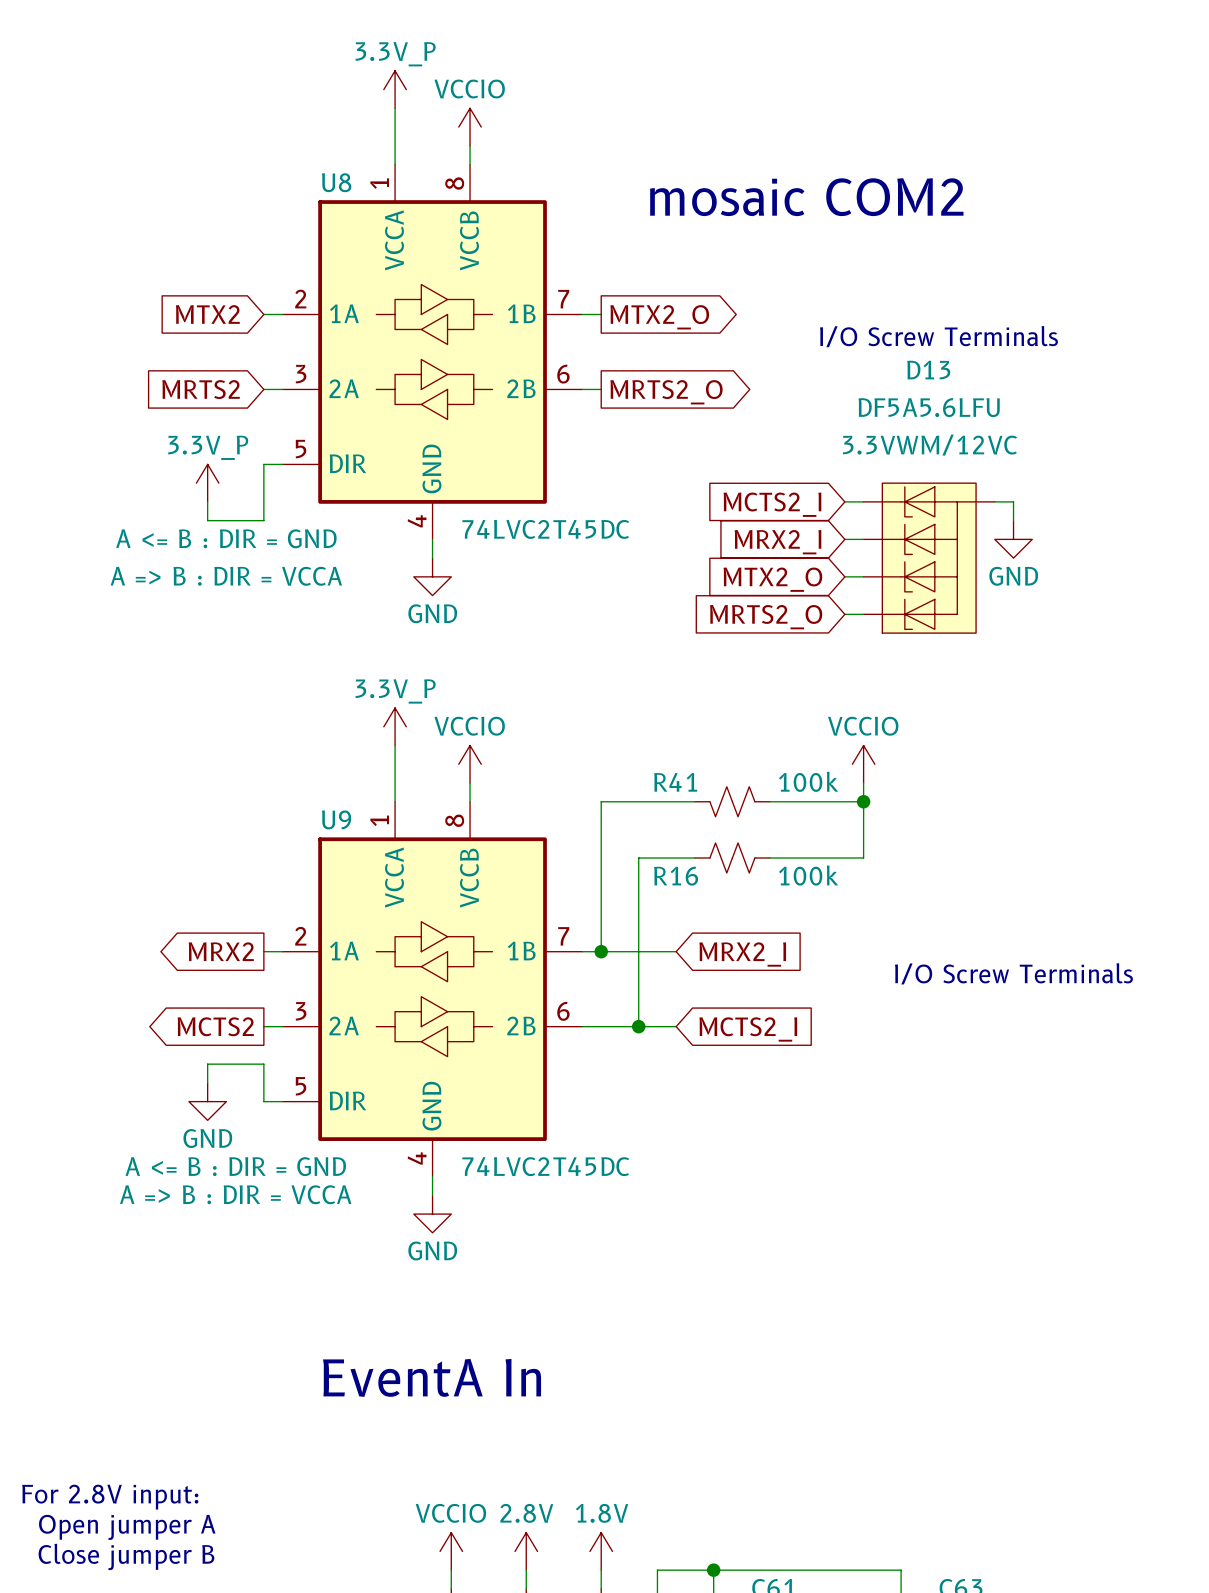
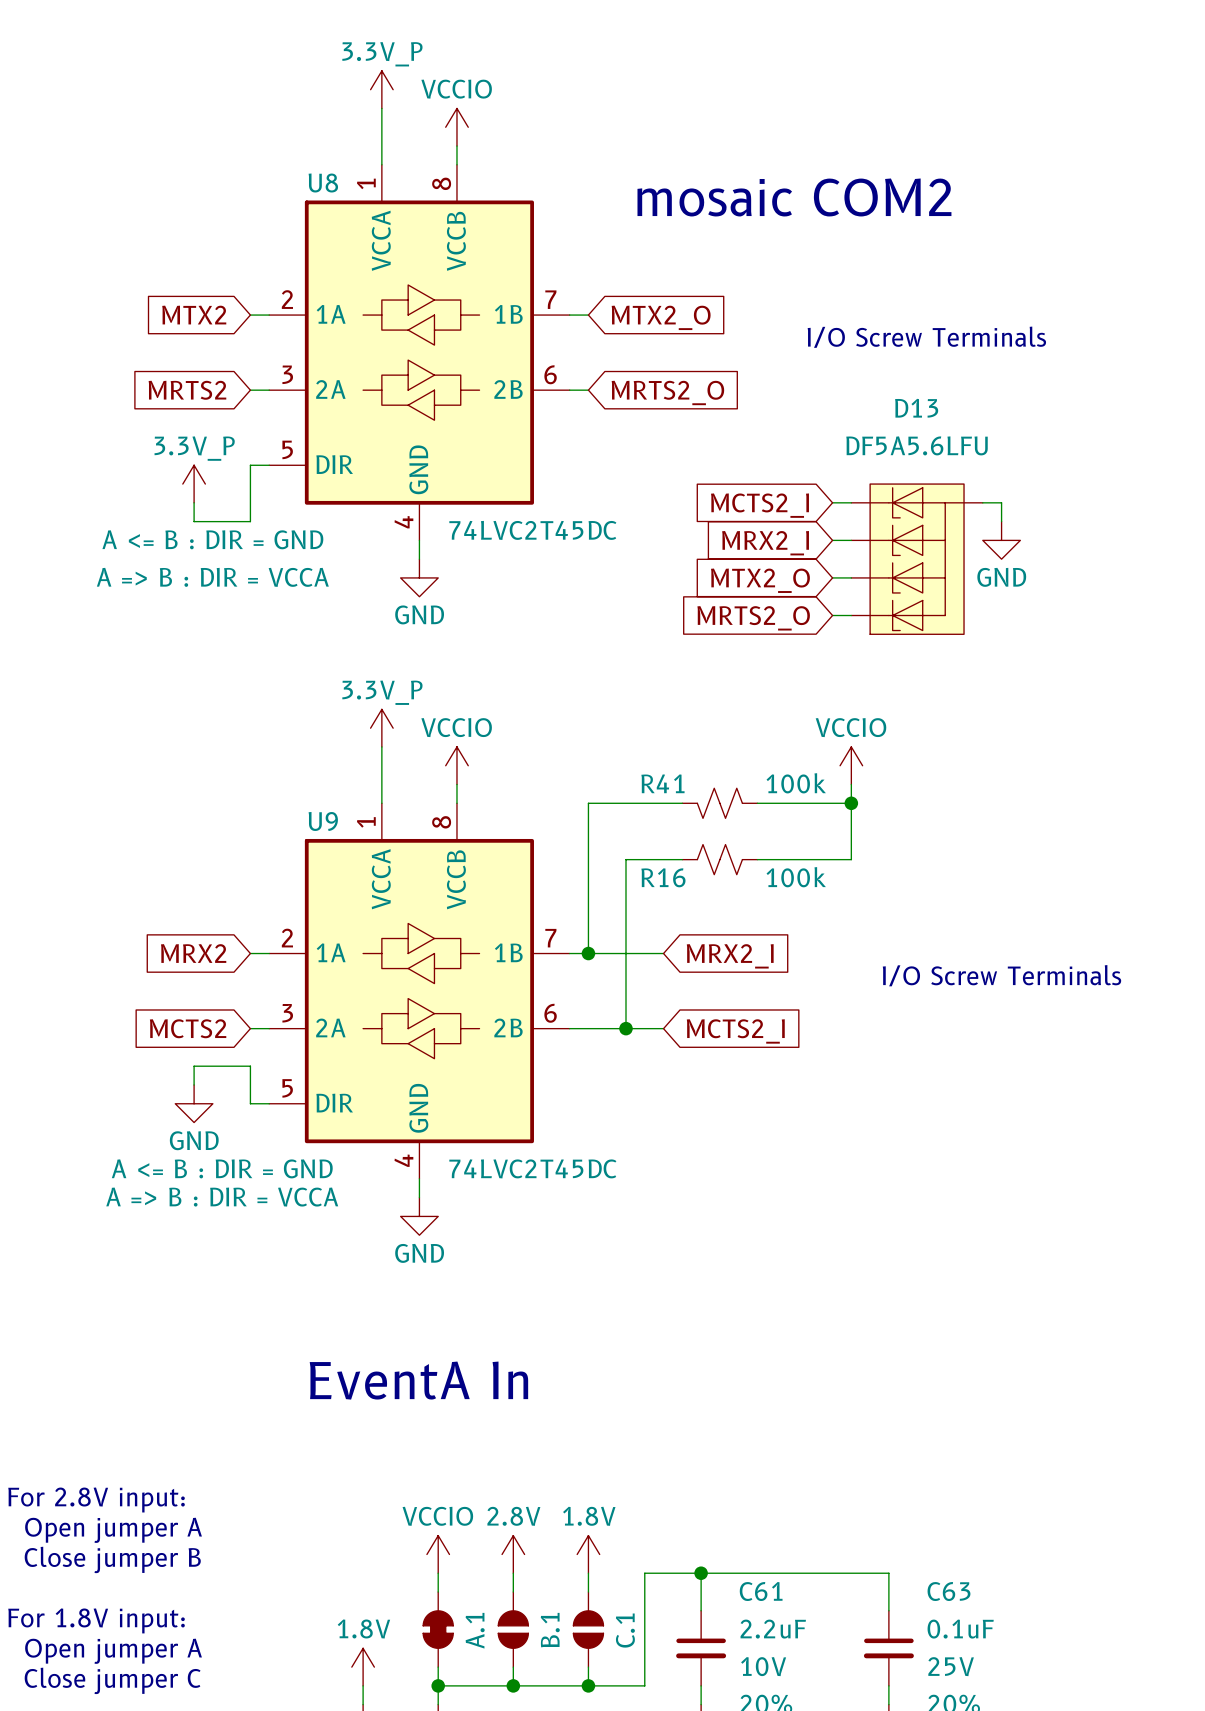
global label shape: output (659, 317) -> input (661, 317)
D13 name position: D13 (928, 370) -> D13 (916, 408)
global label shape: output (666, 392) -> input (667, 392)
D13 value position: DF5A5.6LFU (929, 407) -> DF5A5.6LFU (917, 445)
D13 text: 3.3VWM/12VC (929, 445) -> none
global label shape: output (221, 951) -> input (193, 953)
global label shape: output (215, 1026) -> input (188, 1028)

